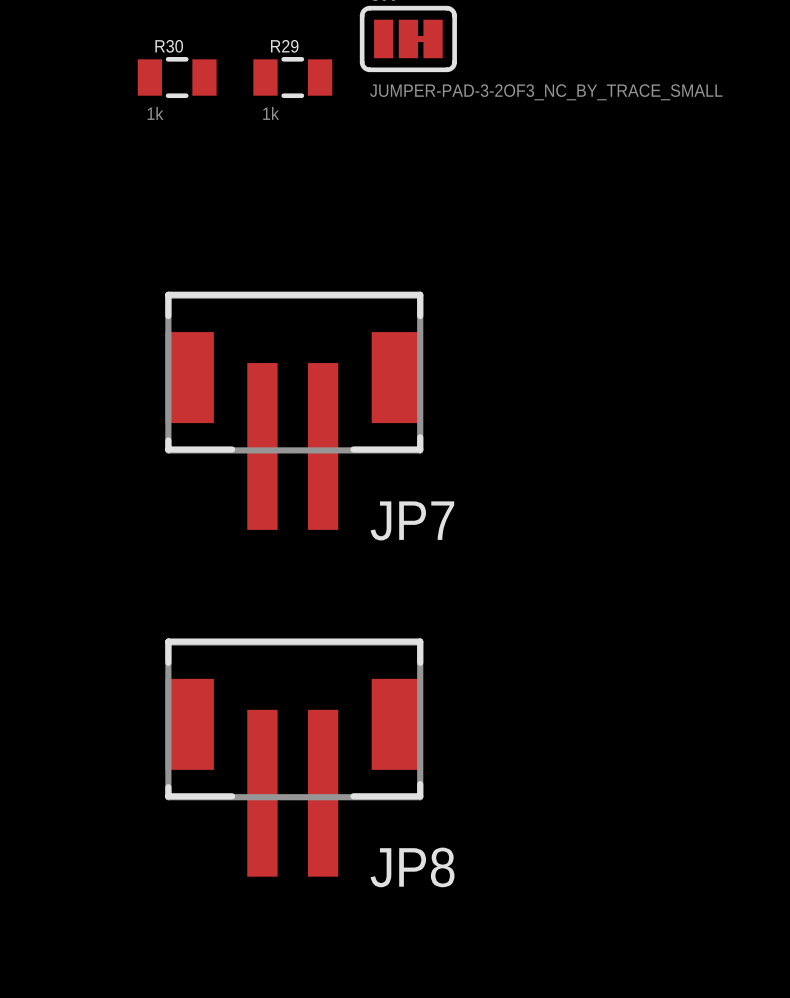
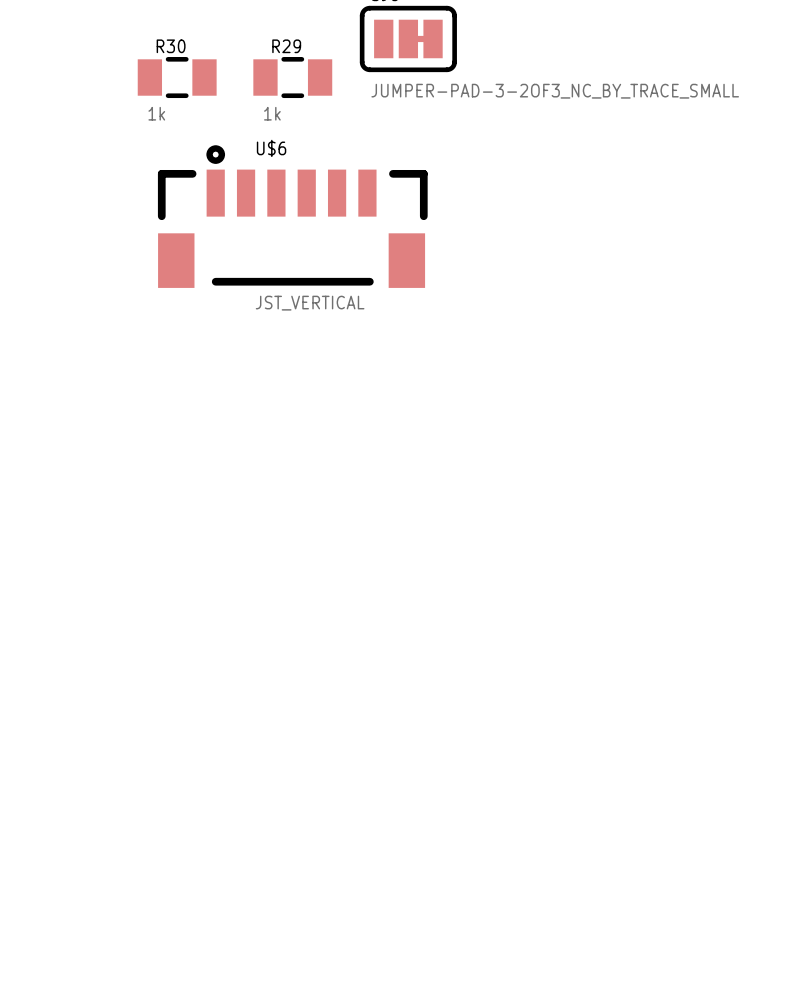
U$6: none -> JST_VERTICAL (292, 216)
JP7: (294, 410) -> none
JP8: (294, 757) -> none

